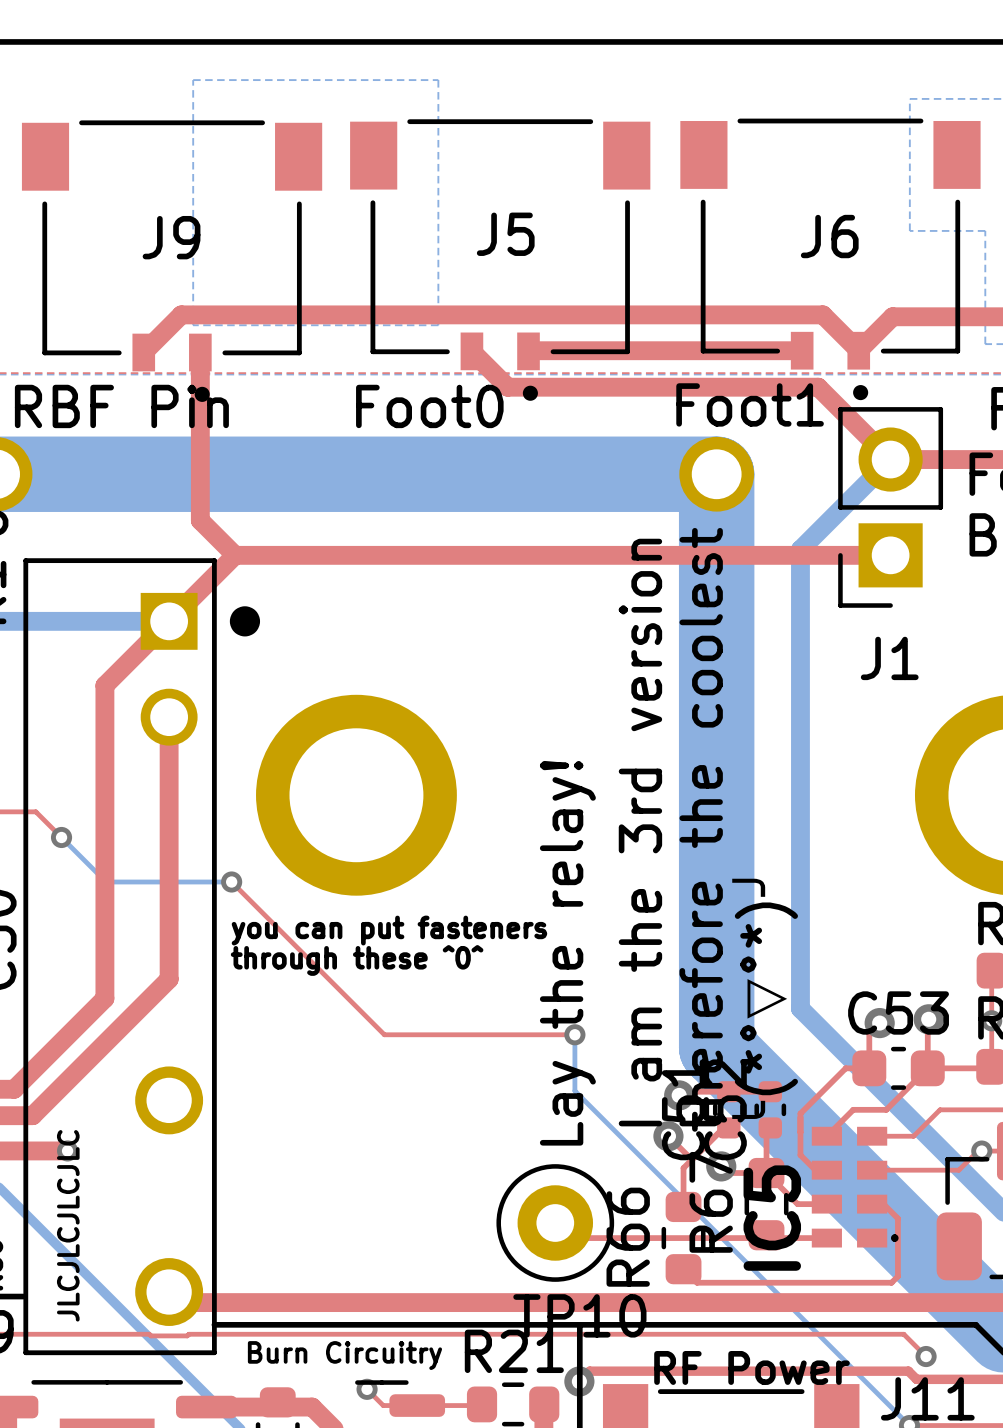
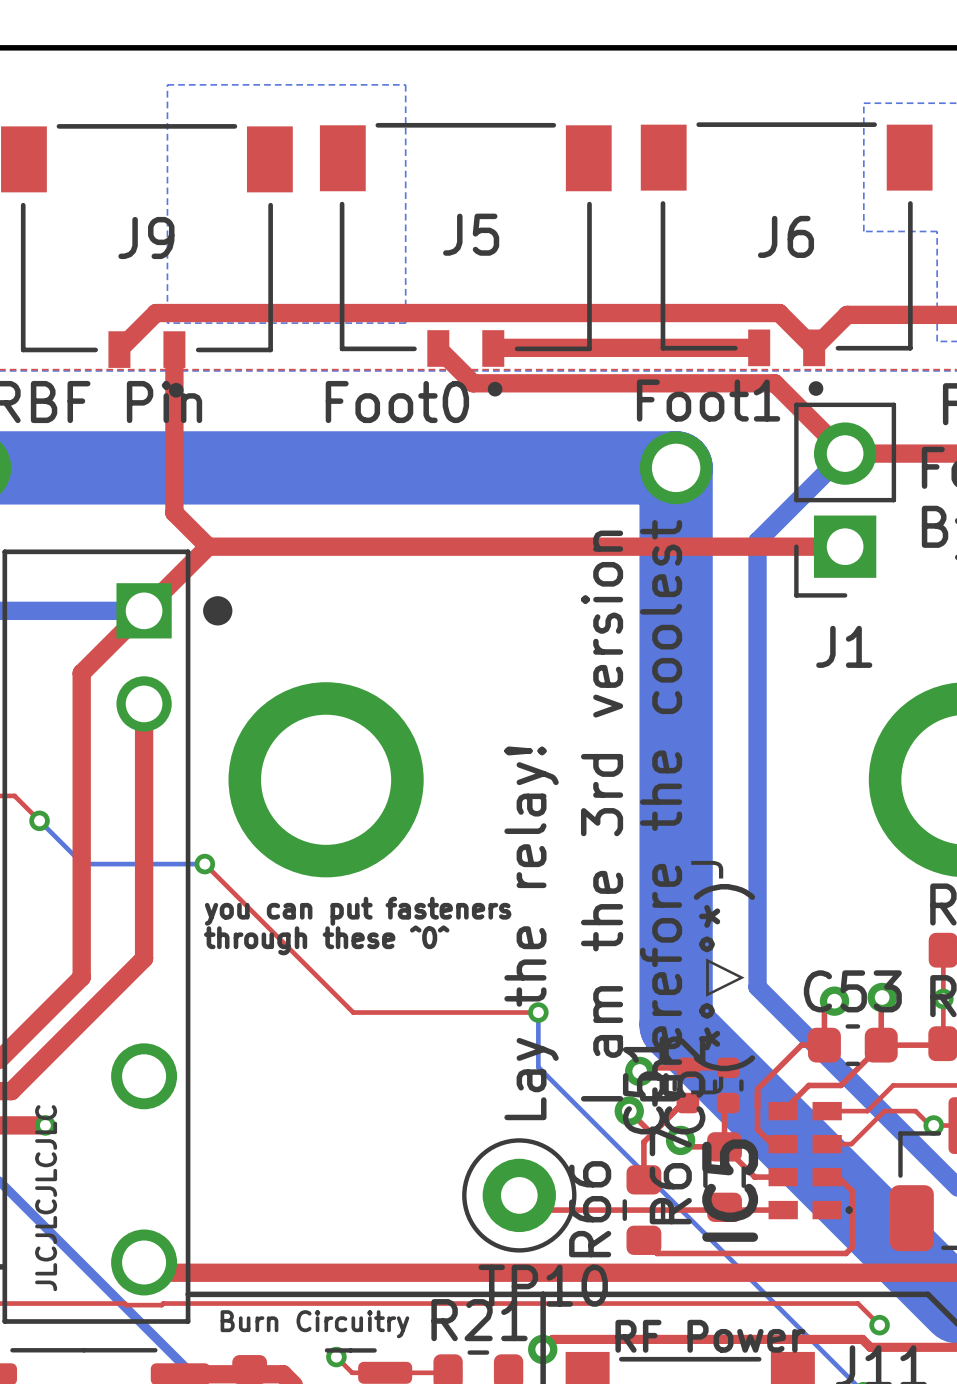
top track: (978, 1151) (958, 1170) (897, 1170) -> (930, 1125) (915, 1111) (884, 1111) (851, 1144)

